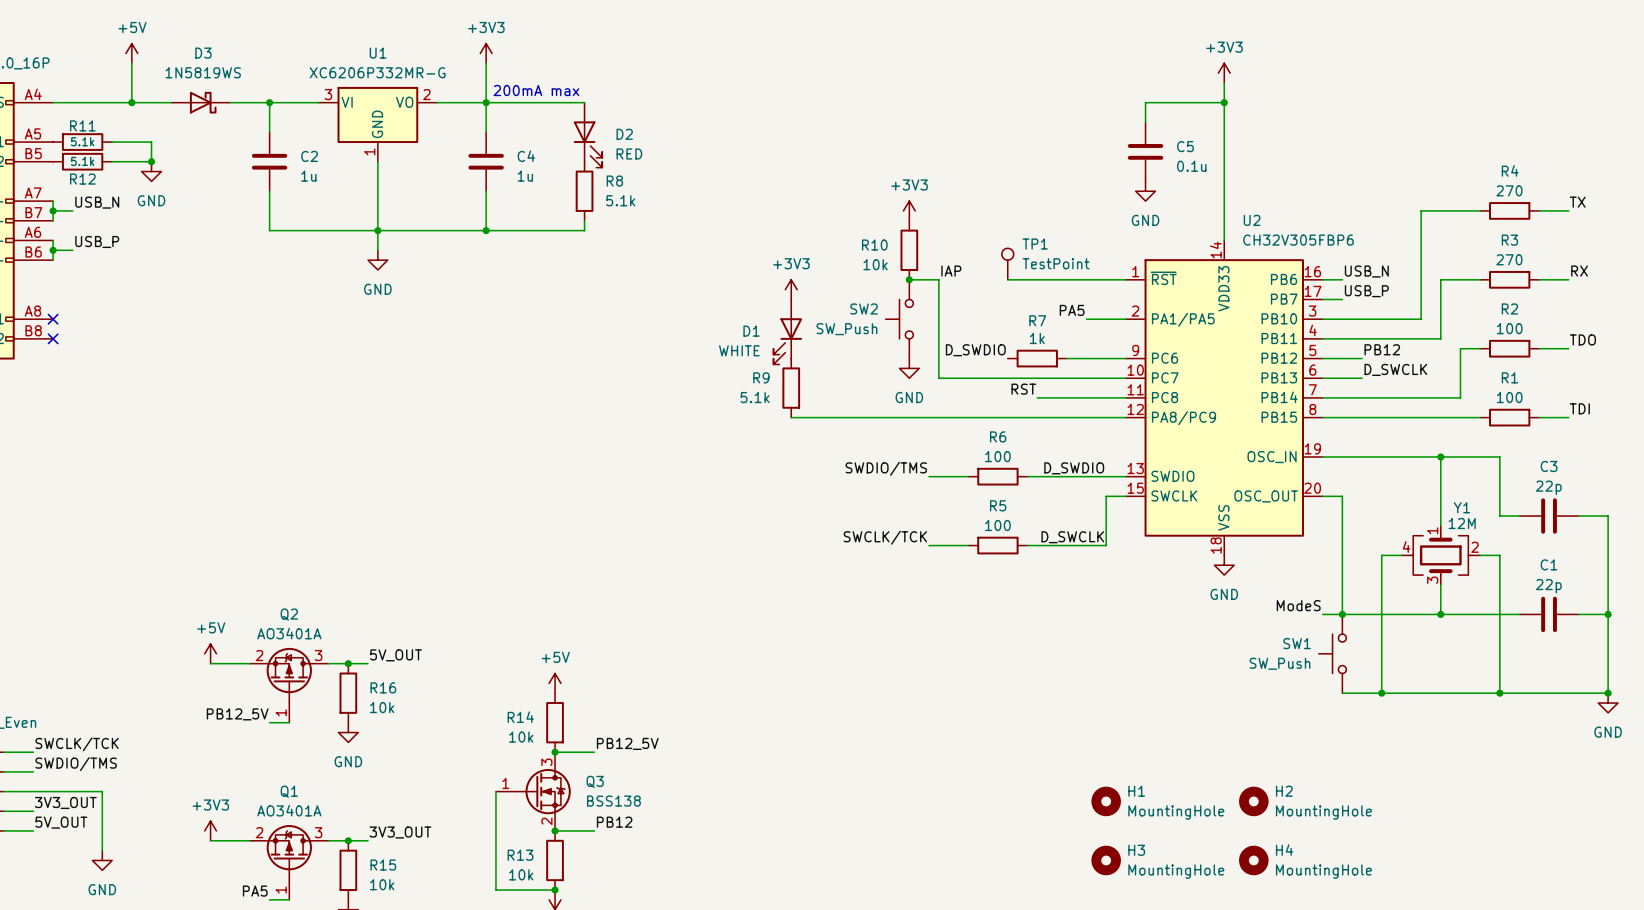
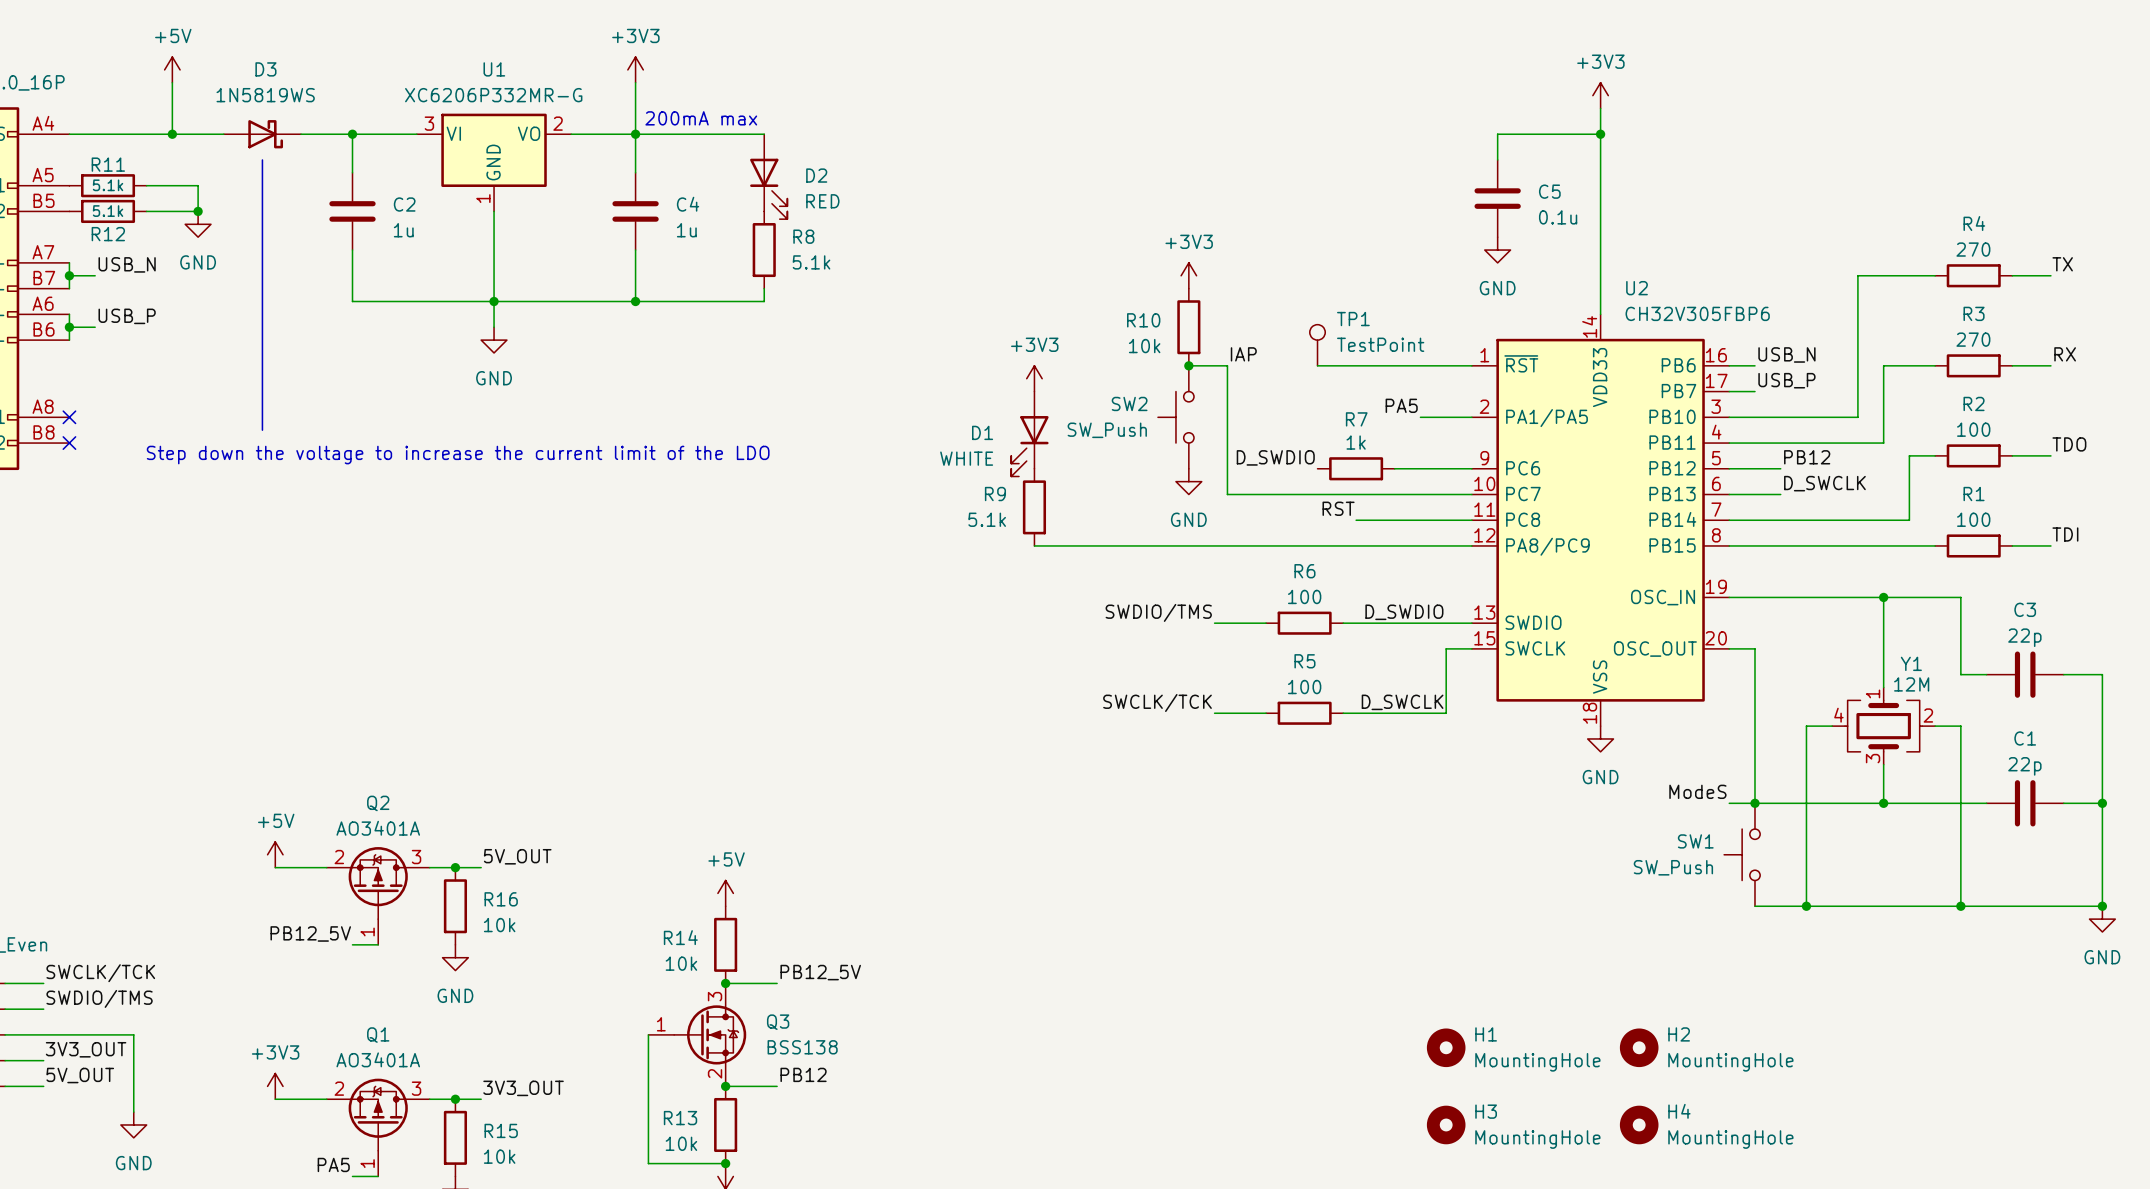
line: none -> (262, 159) (262, 430)
text: none -> Step down the voltage to increase the current limit of the LDO (458, 455)

